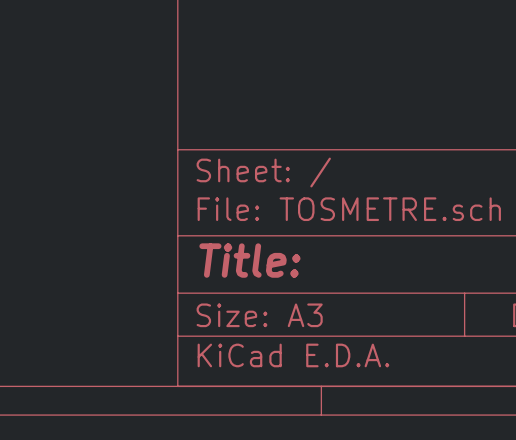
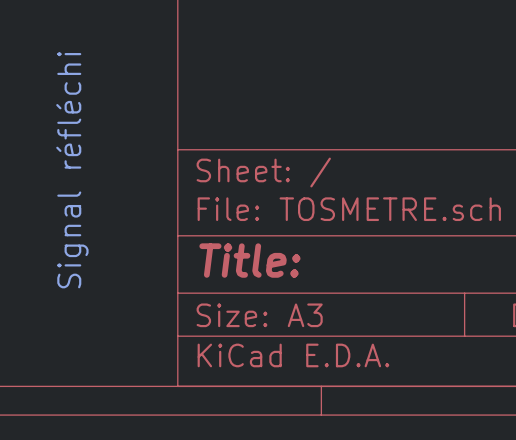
text: none -> Signal réfléchi (72, 170)

